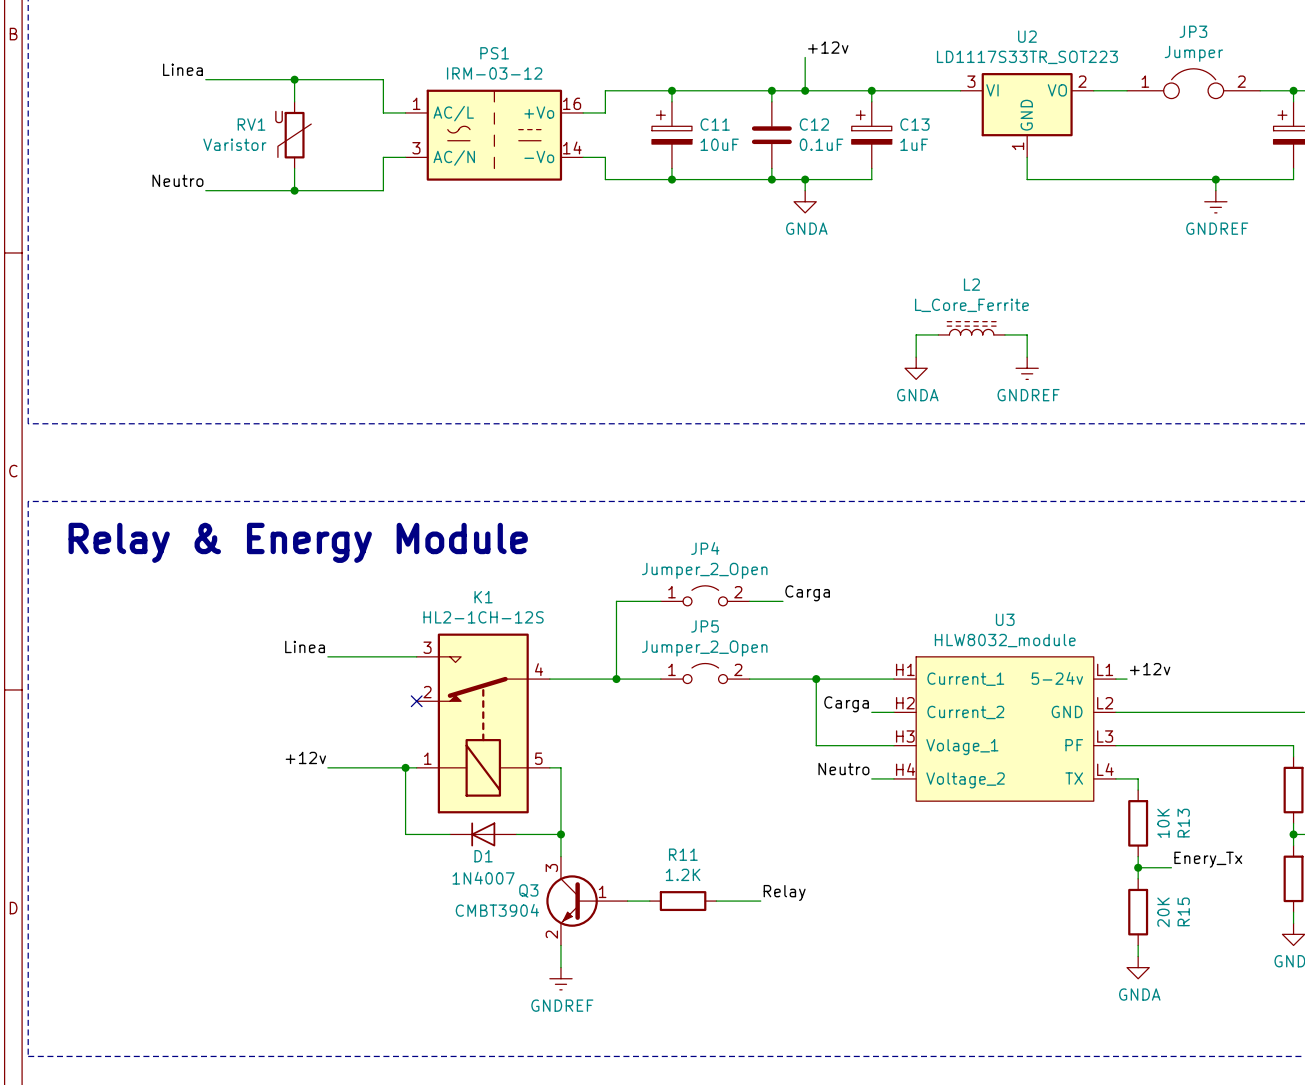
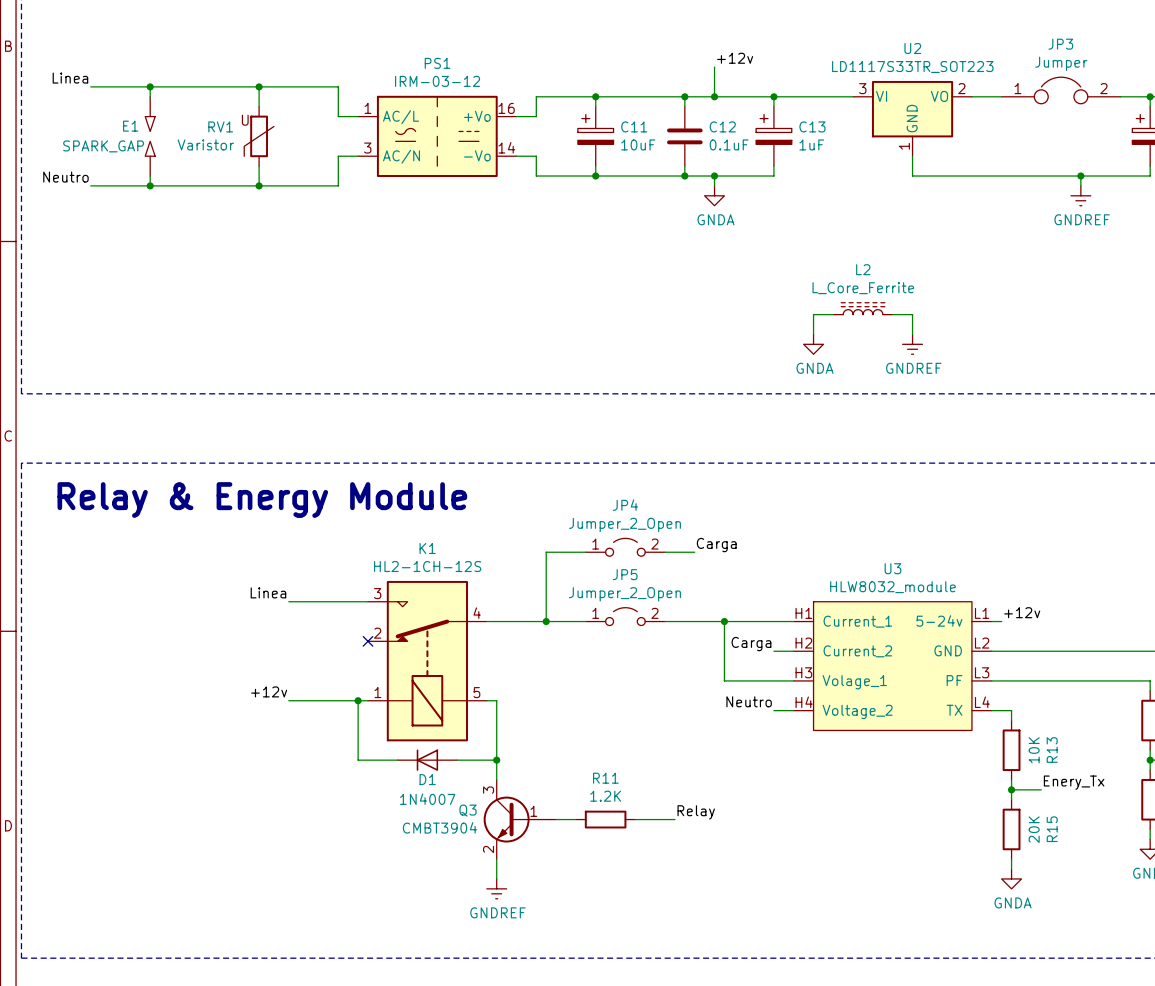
label position: Linea (182, 69) -> Linea (70, 78)
wire: none -> (90, 86) (179, 86)
wire: none -> (150, 86) (150, 96)
junction: none -> (150, 86)
E1: none -> SPARK_GAP (150, 136)
wire: none -> (150, 176) (150, 185)
label position: Neutro (177, 180) -> Neutro (65, 177)
wire: none -> (90, 185) (179, 185)
junction: none -> (150, 185)

